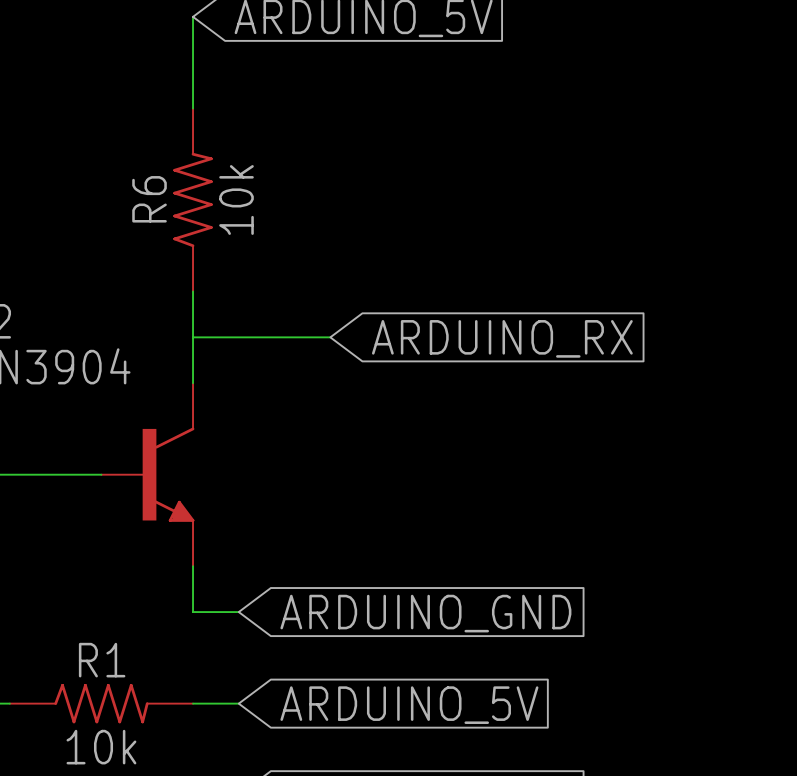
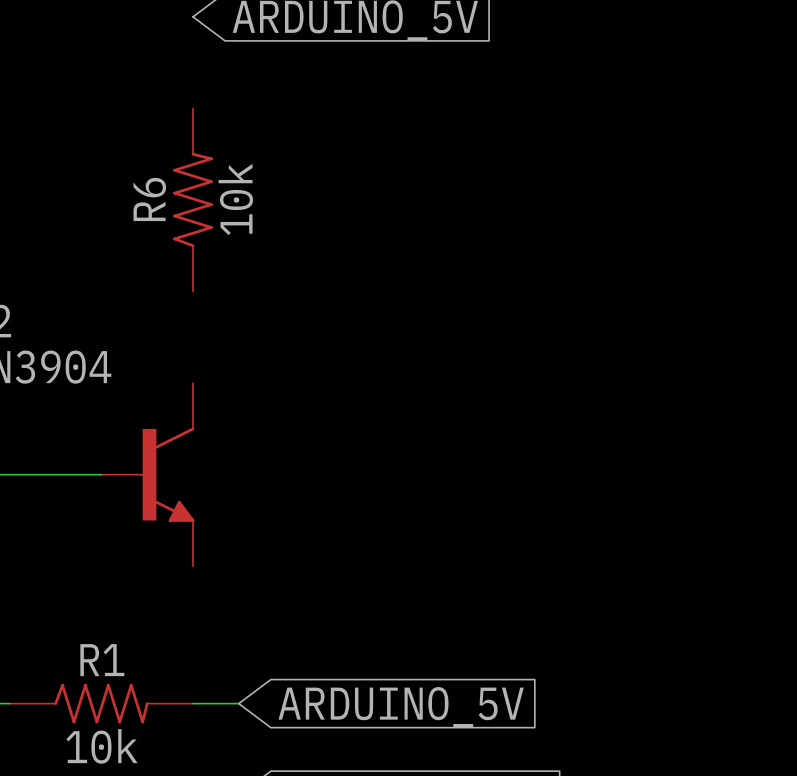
wire: (193, 16) (193, 108) -> none
wire: (193, 291) (193, 383) -> none
wire: (193, 337) (330, 337) -> none
global label: ARDUINO_RX (502, 338) -> none
wire: (193, 566) (193, 612) (238, 612) -> none
global label: ARDUINO_GND (425, 613) -> none

